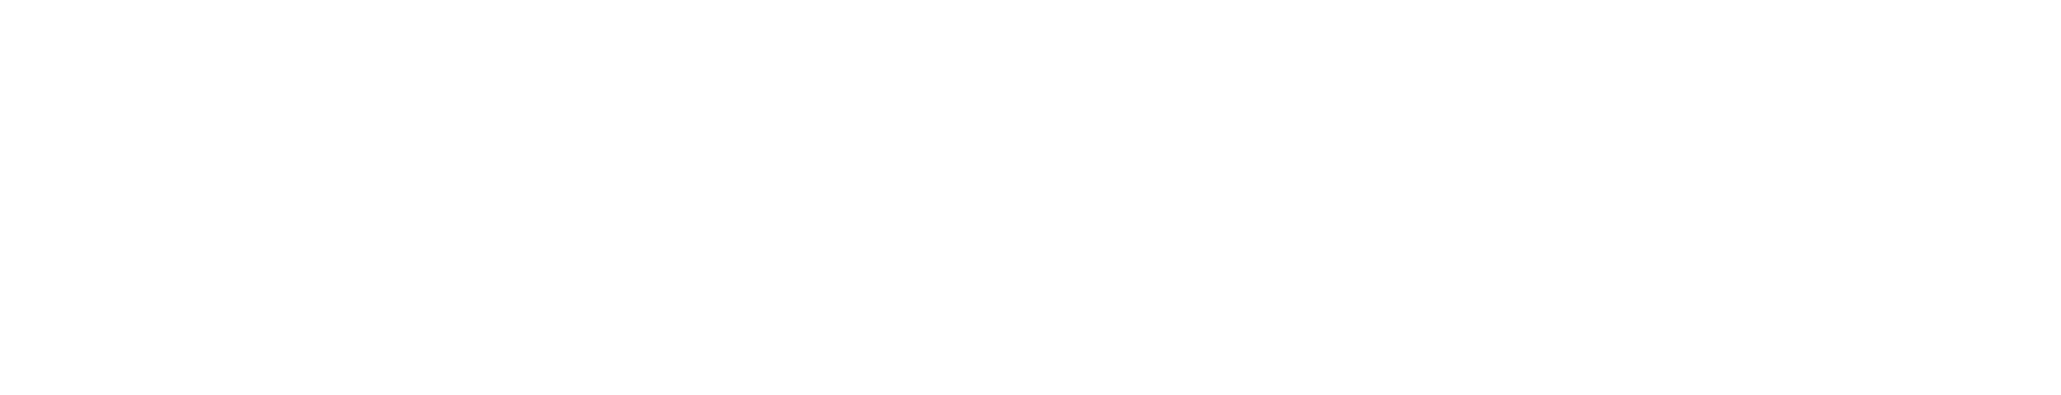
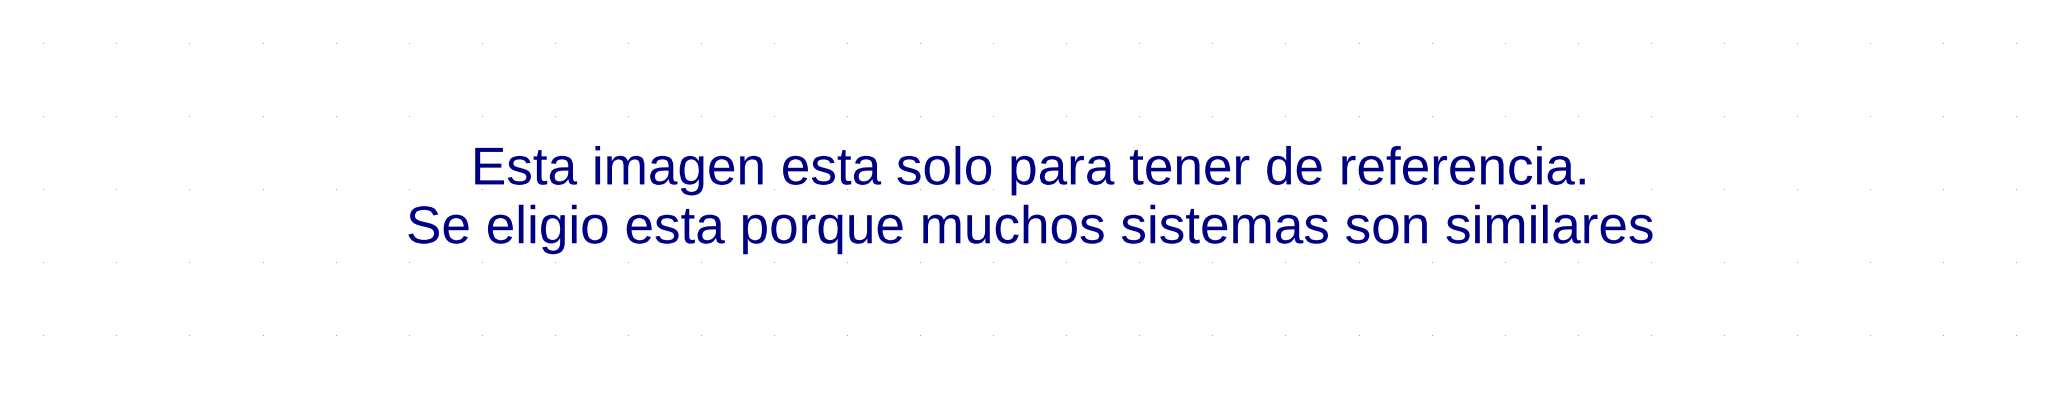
text: none -> Esta imagen esta solo para tener de referencia. (1030, 170)
text: none -> Se eligio esta porque muchos sistemas son similares (1030, 229)

